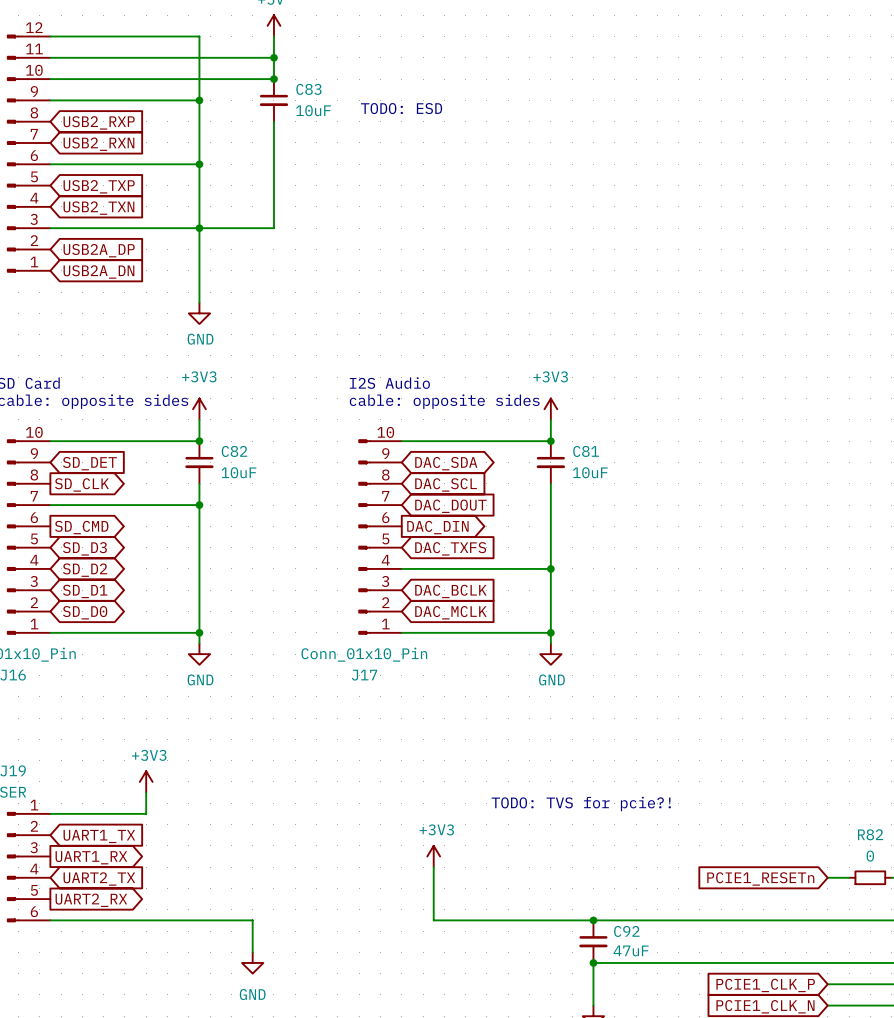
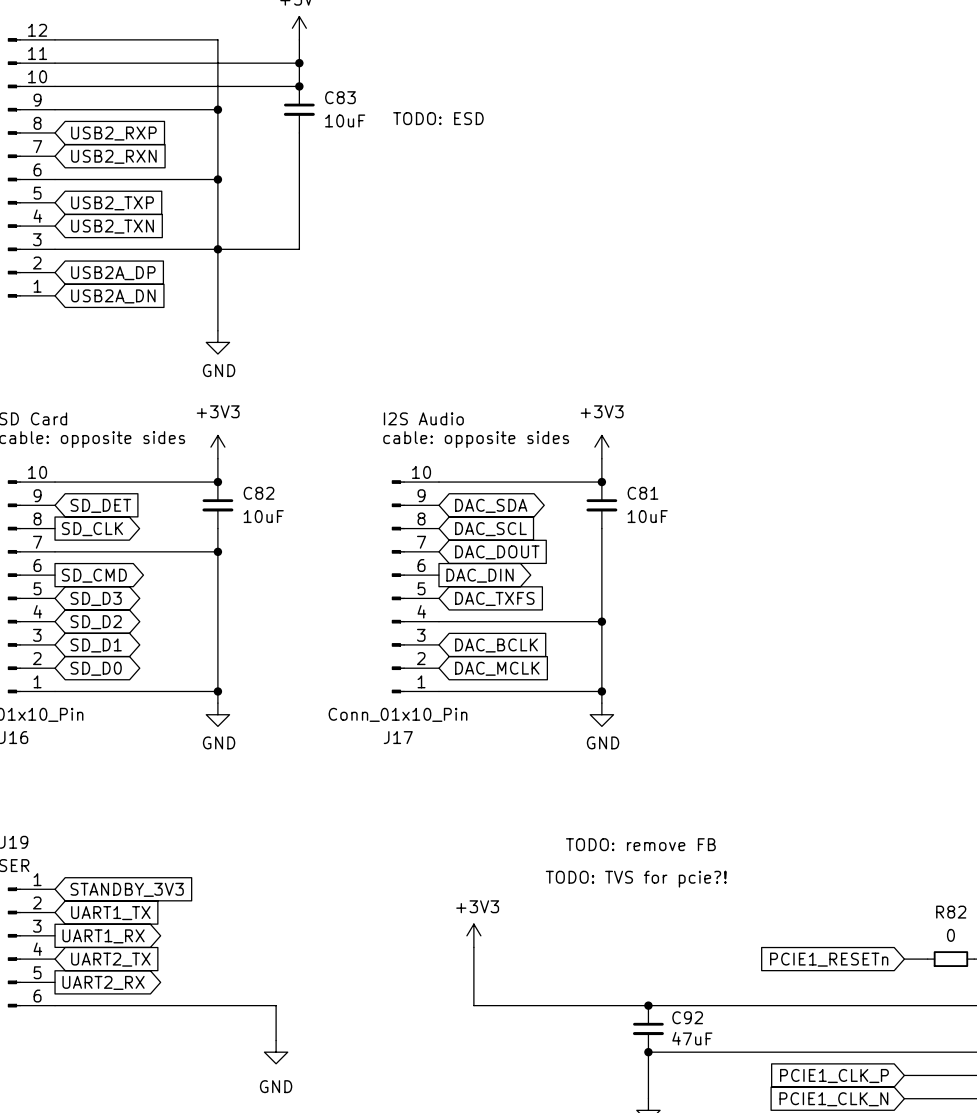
text: none -> TODO: remove FB (640, 844)
power symbol: +3V3 (146, 781) -> none
wire: (146, 792) (146, 813) (50, 813) -> none
global label: none -> STANDBY_3V3 (127, 889)

